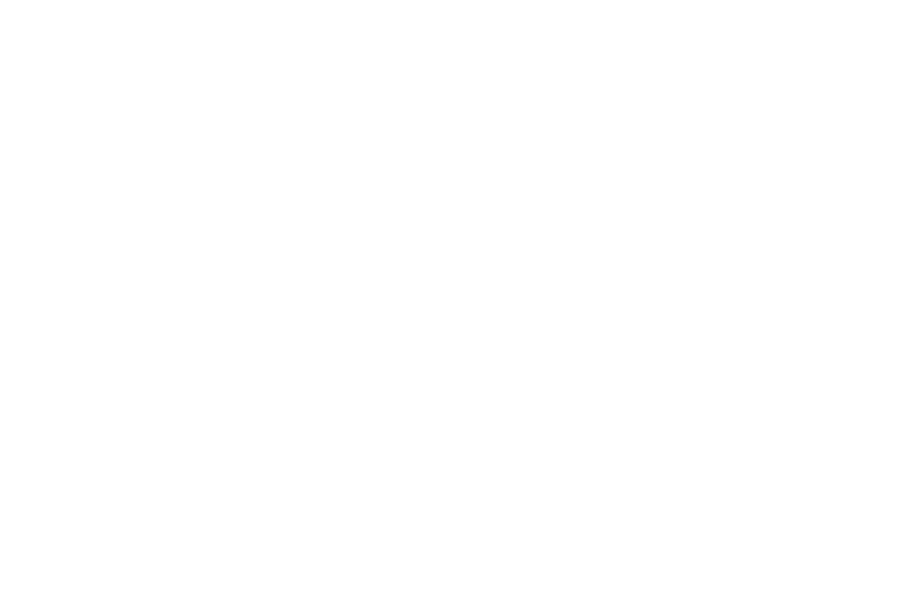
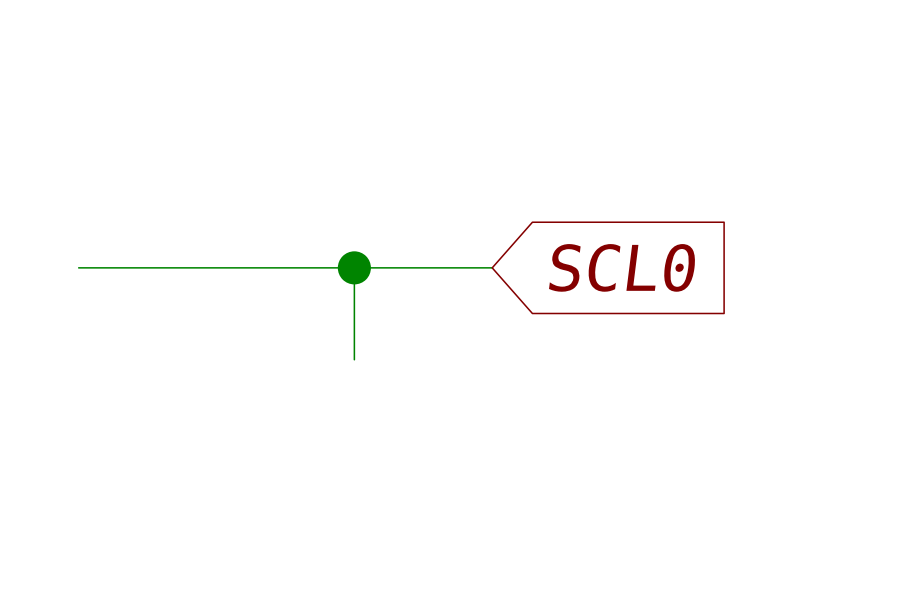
wire: none -> (78, 267) (492, 267)
wire: none -> (354, 267) (354, 359)
junction: none -> (354, 267)
global label: none -> SCL0 (622, 267)

